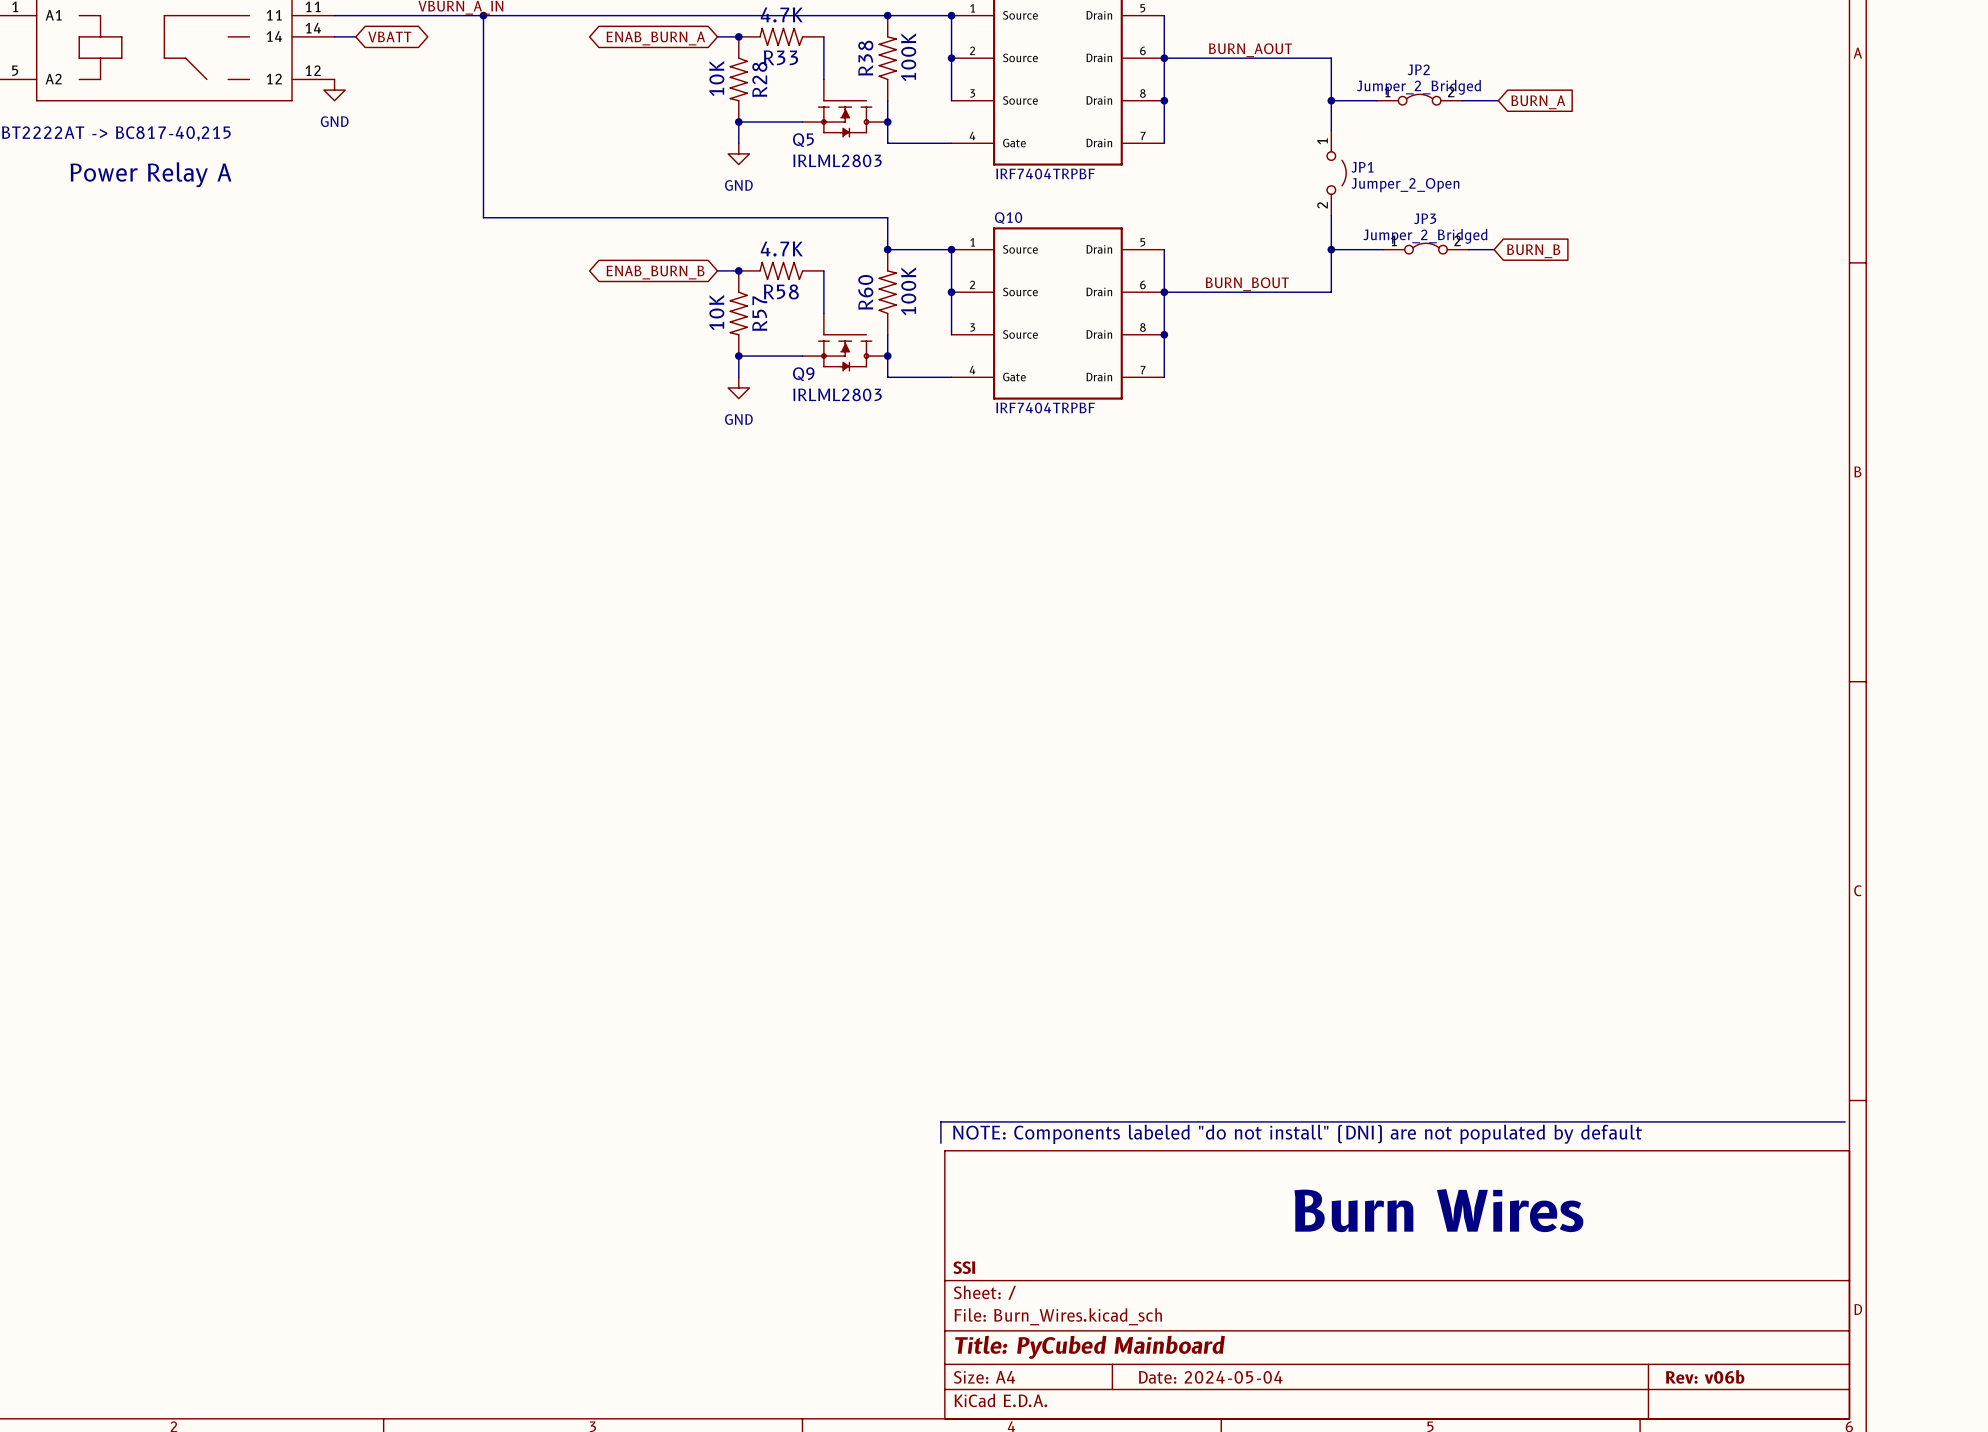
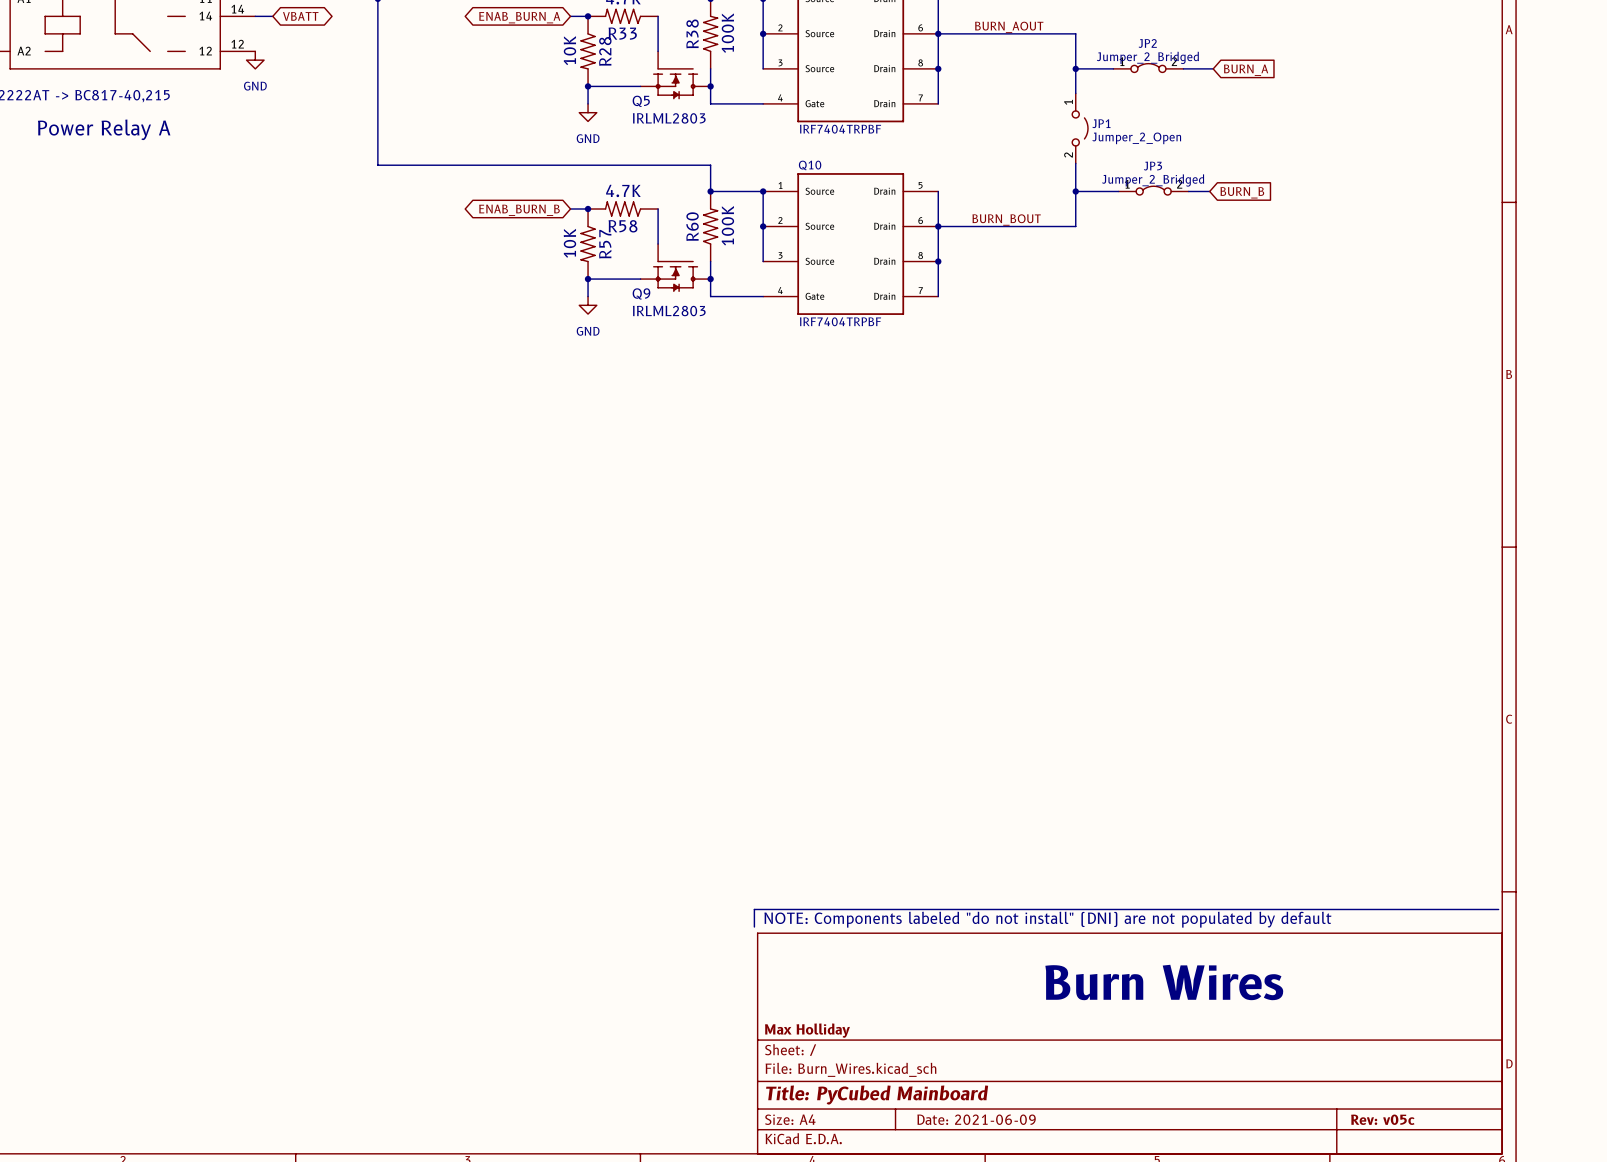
title block: SSI (964, 1267) -> Max Holliday (807, 1030)
title block: Rev: v06b (1705, 1376) -> Rev: v05c (1382, 1119)
title block: Date: 2024-05-04 (1210, 1377) -> Date: 2021-06-09 (976, 1119)

